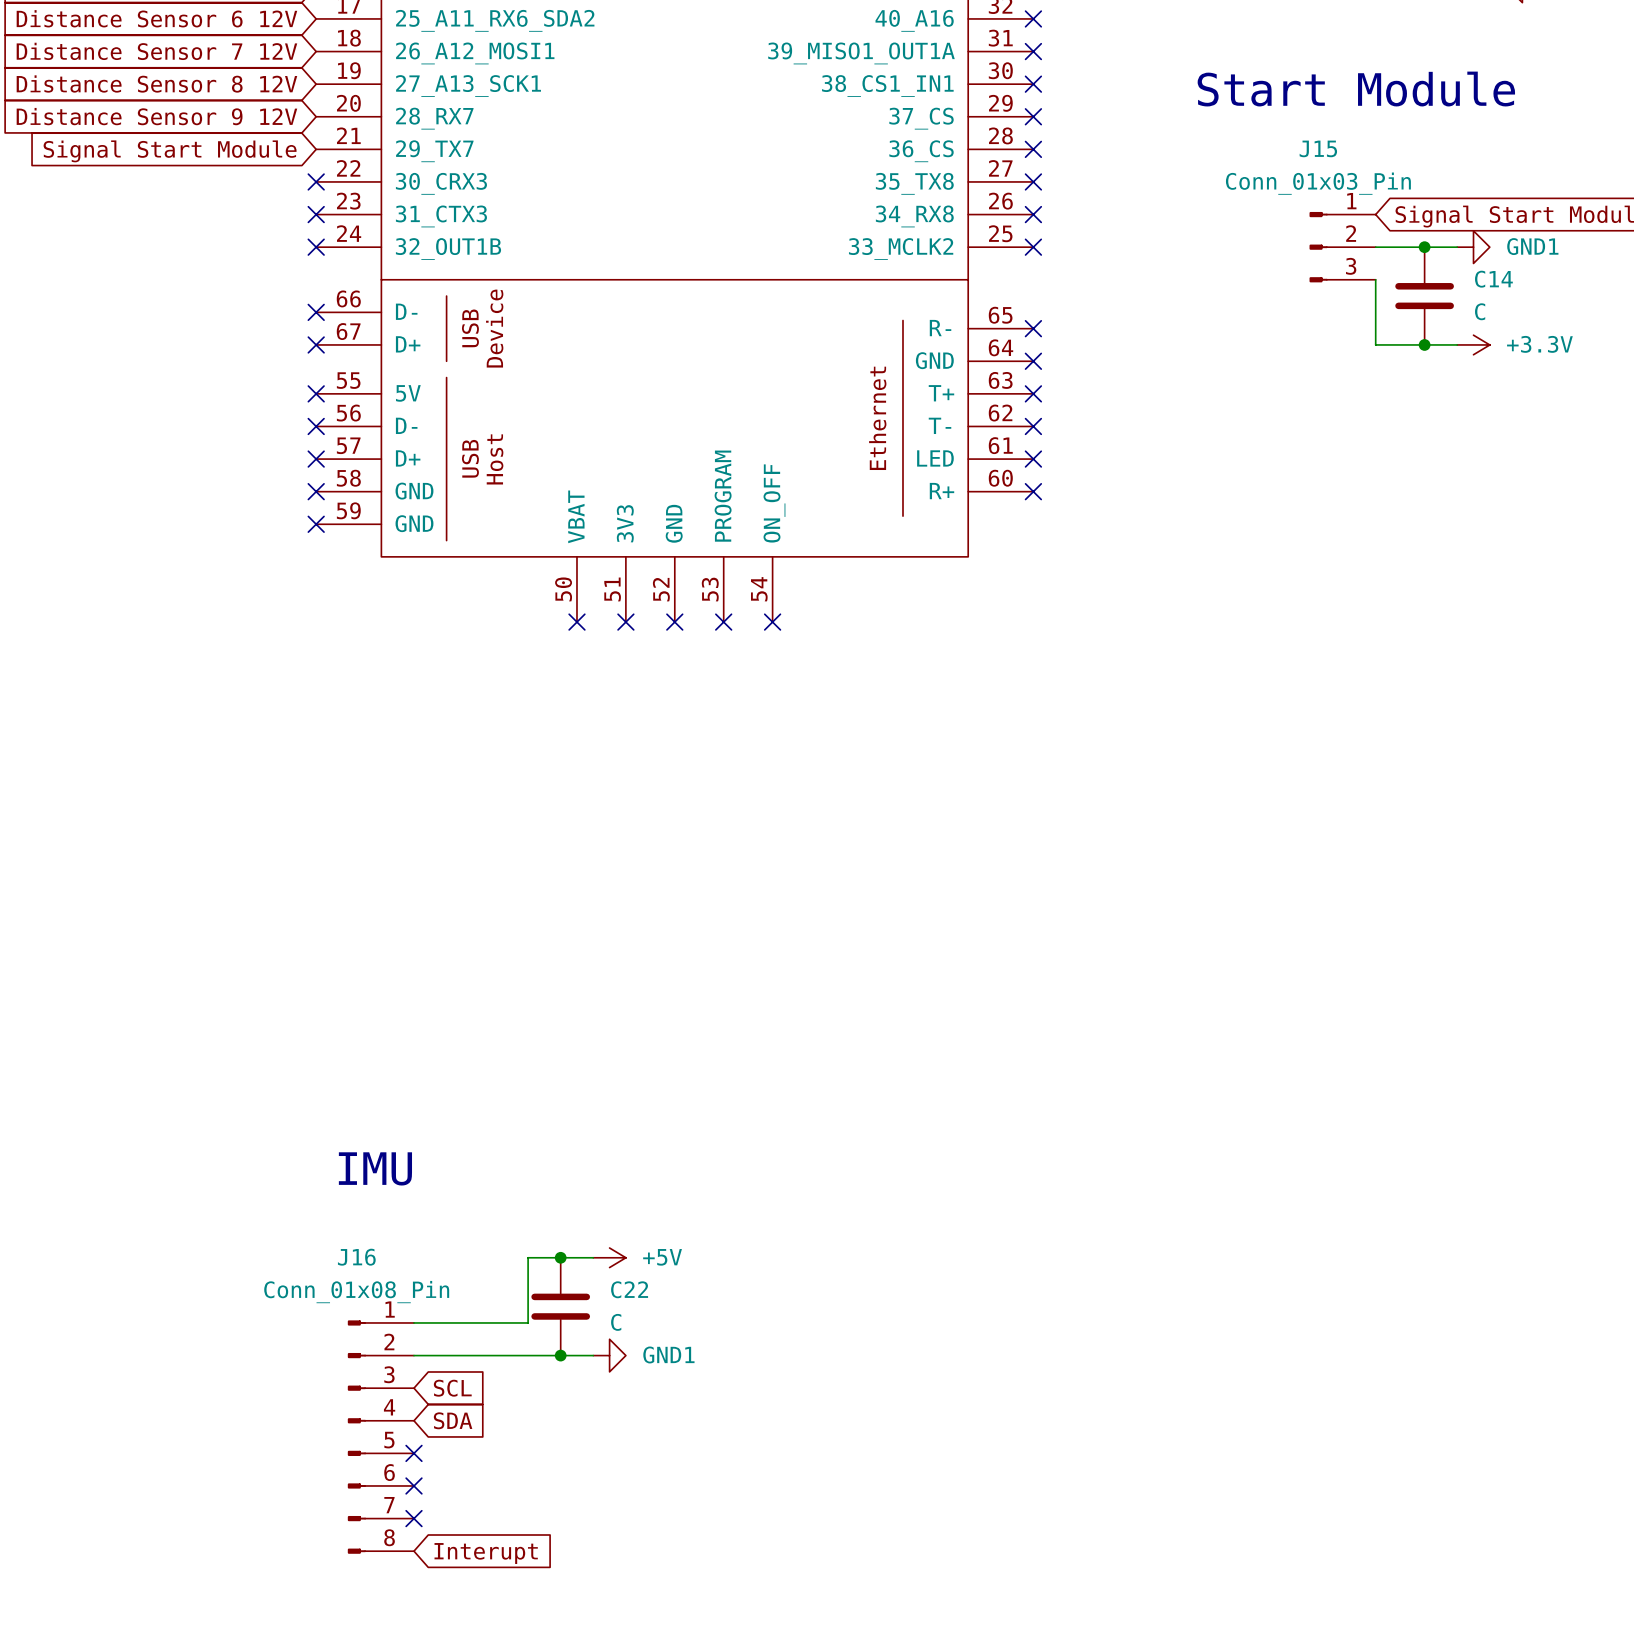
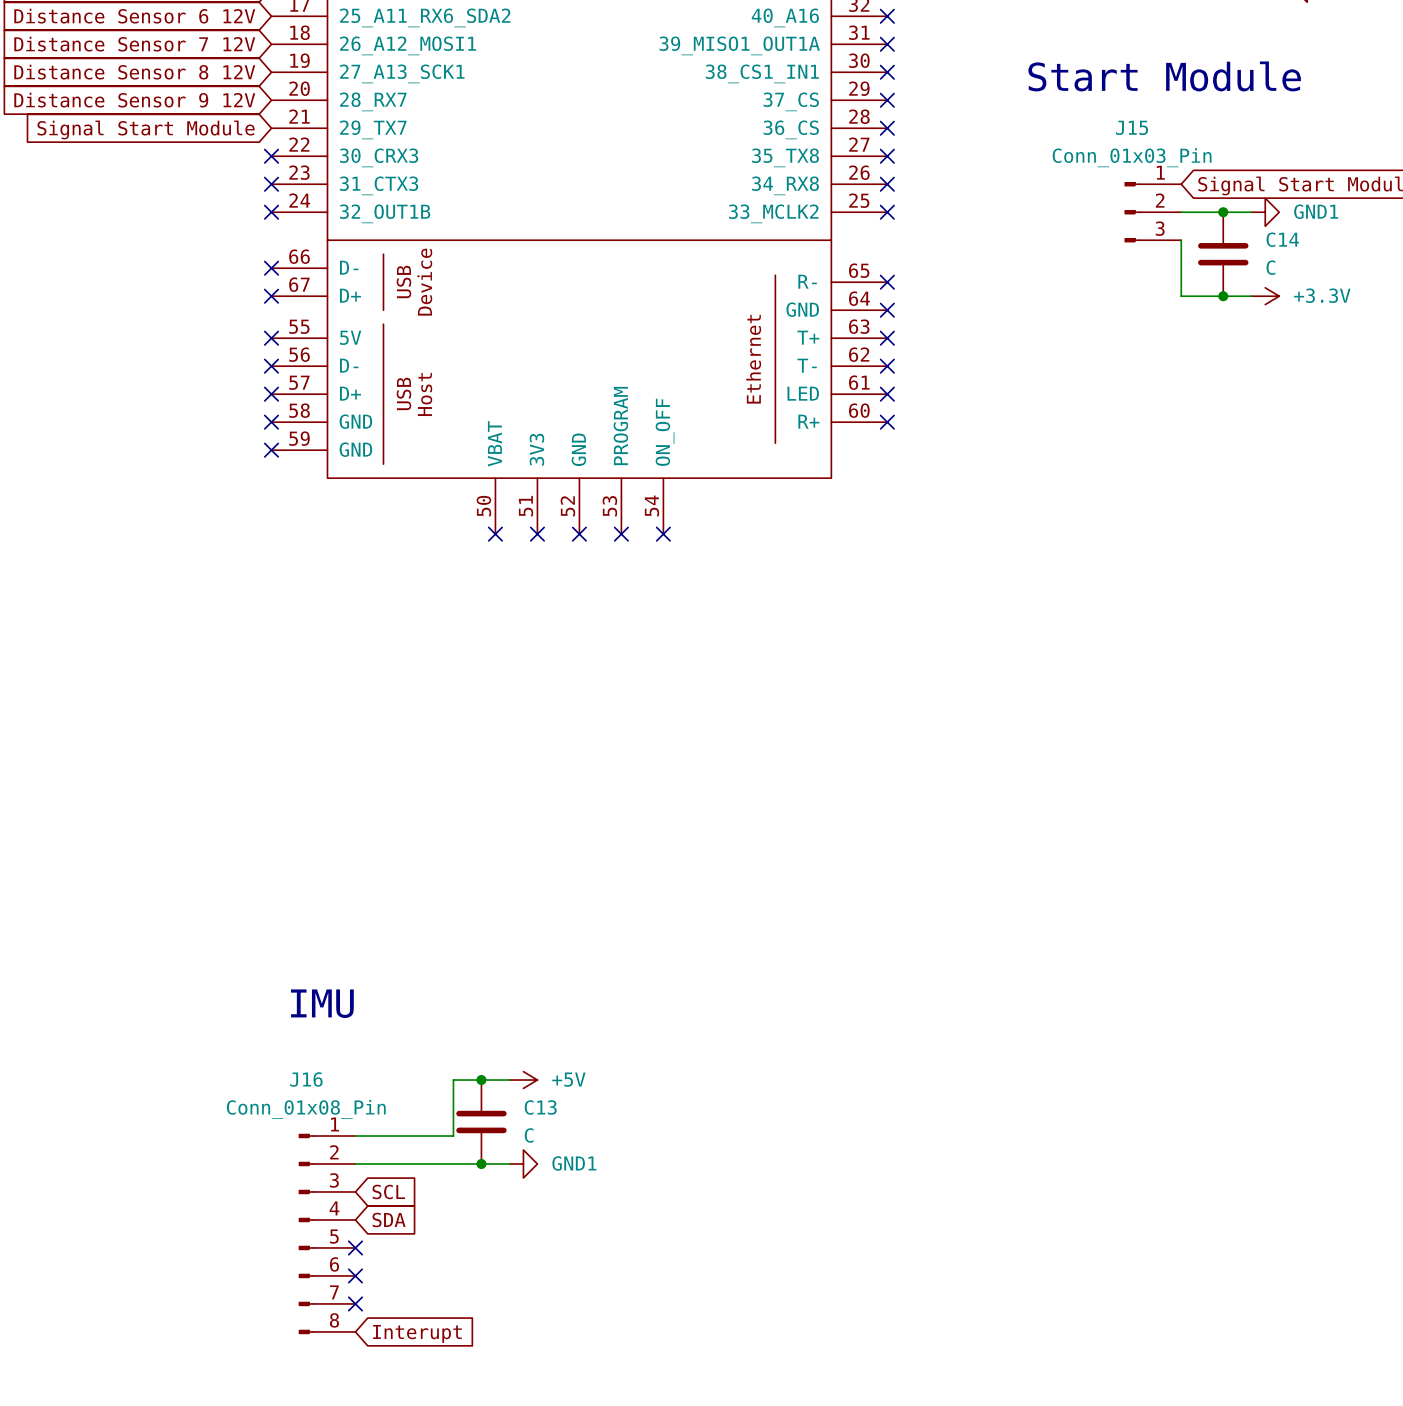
C22 name: C22 (629, 1289) -> C13 (540, 1107)

